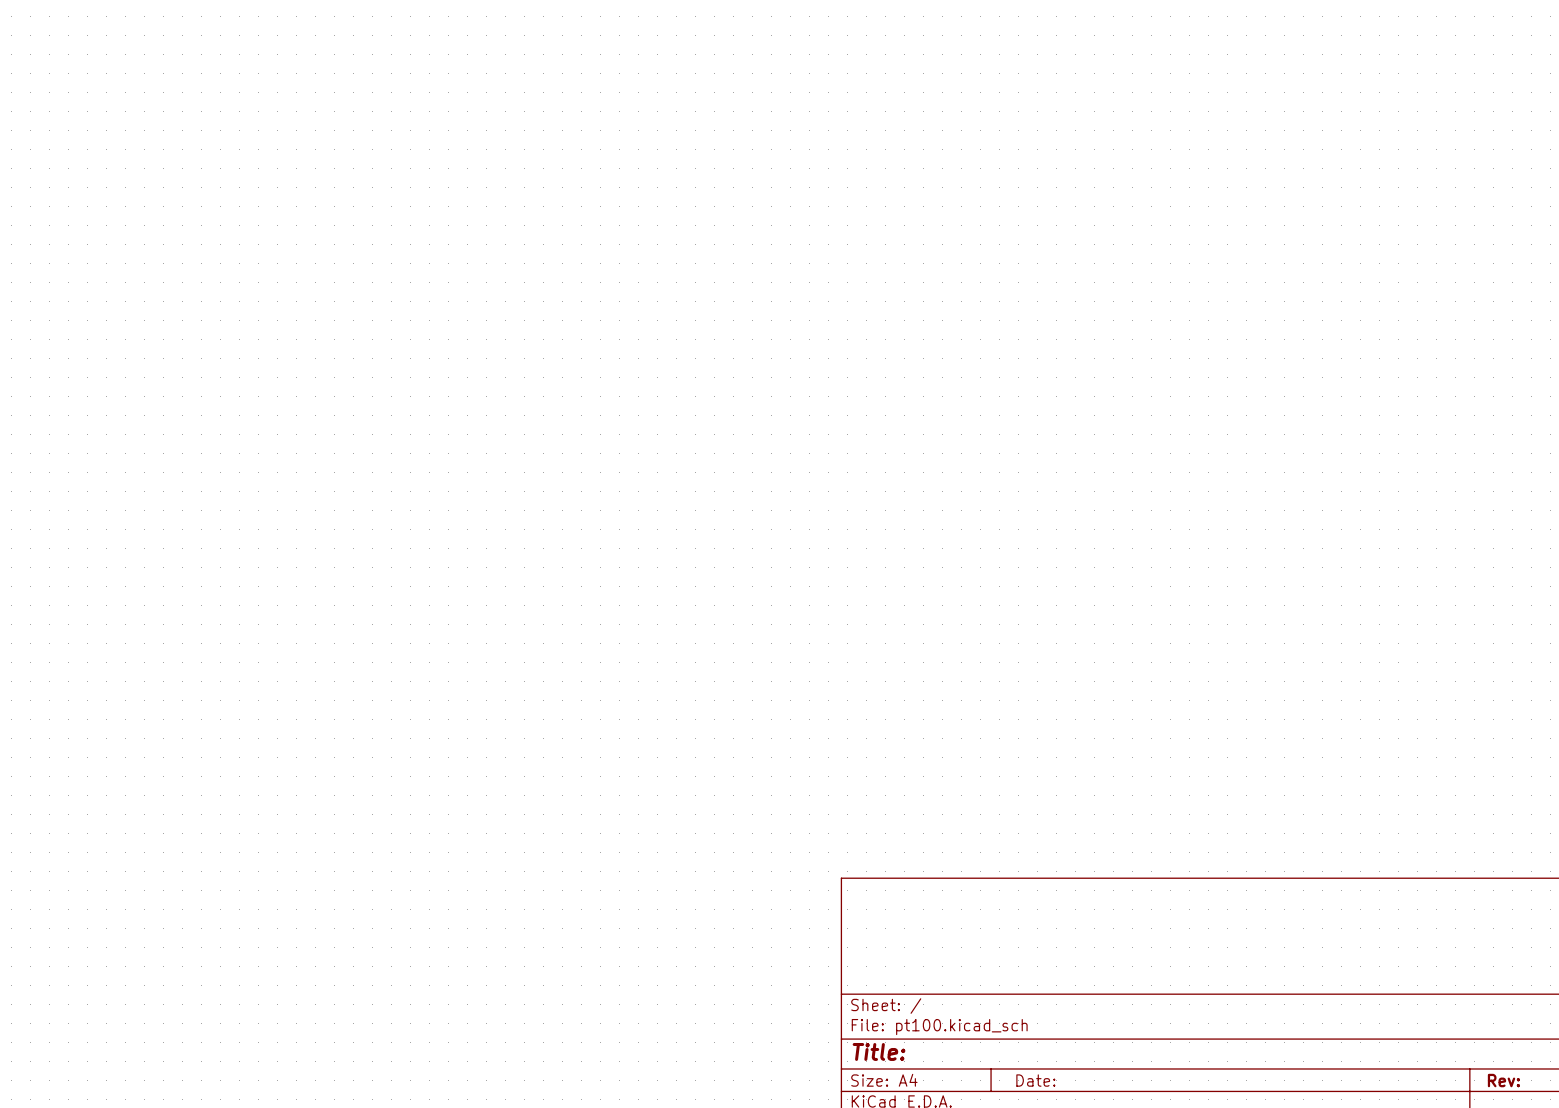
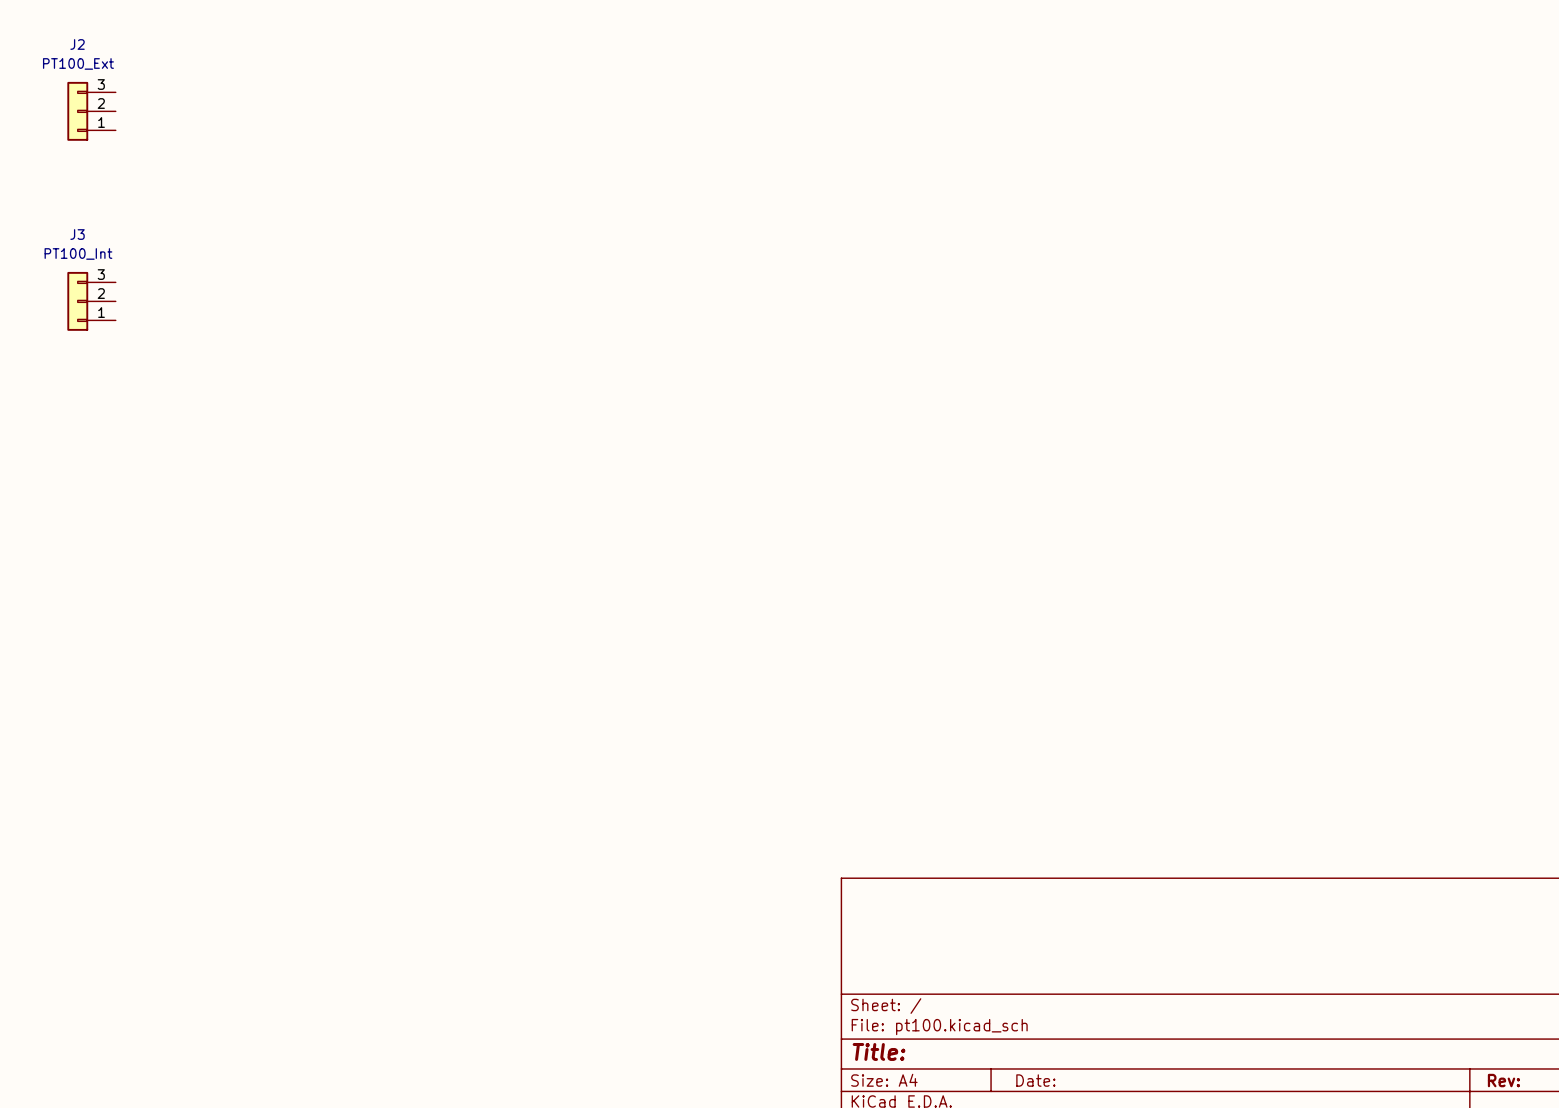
J2: none -> PT100_Ext (91, 111)
J3: none -> PT100_Int (91, 301)

